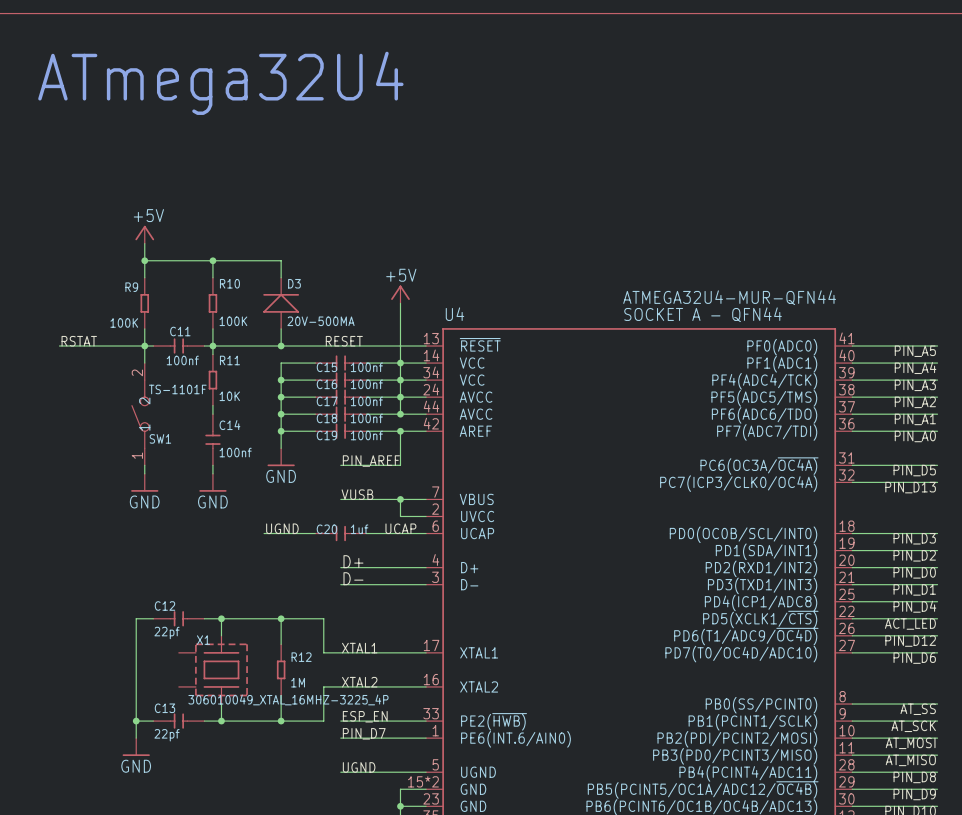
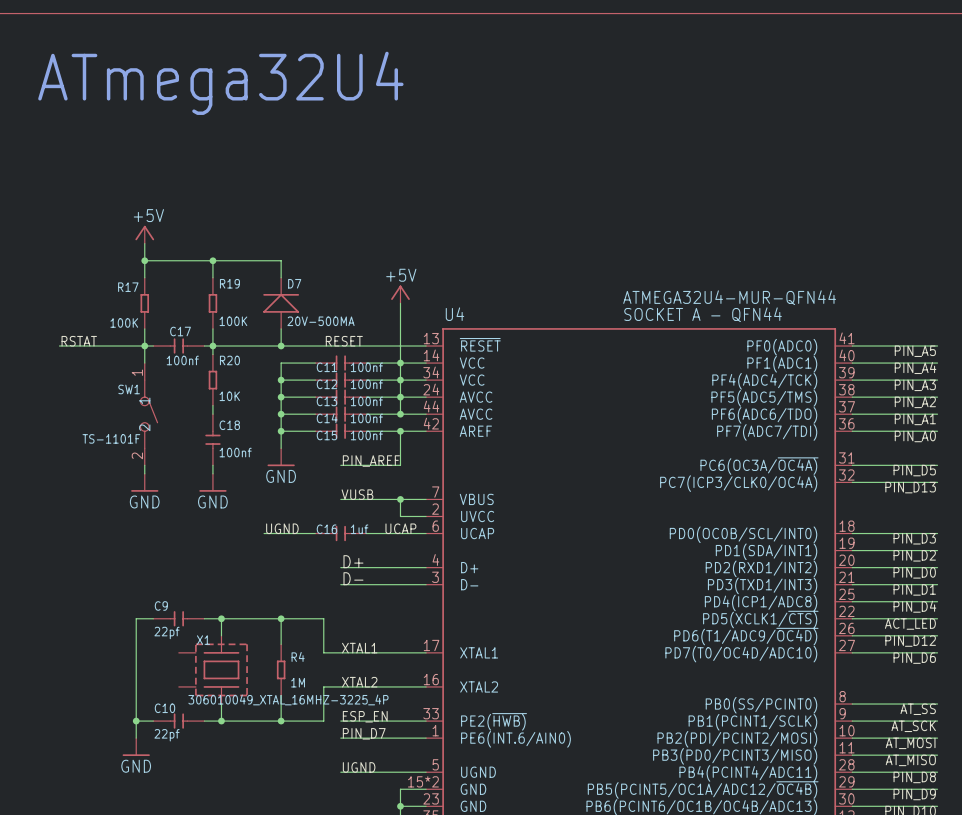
R10 name: R10 (229, 283) -> R19 (229, 283)
D3 name: D3 (294, 283) -> D7 (294, 283)
R9 name: R9 (131, 287) -> R17 (128, 287)
C11 name: C11 (180, 331) -> C17 (180, 331)
R11 name: R11 (229, 360) -> R20 (229, 360)
C15 name: C15 (326, 367) -> C11 (326, 367)
C16 name: C16 (326, 384) -> C12 (326, 384)
C17 name: C17 (327, 401) -> C13 (326, 401)
SW1 rotation: 0° (140, 414) -> 180° (149, 414)
C18 name: C18 (326, 418) -> C14 (327, 418)
C14 name: C14 (229, 425) -> C18 (229, 425)
C19 name: C19 (326, 435) -> C15 (326, 435)
C20 name: C20 (326, 529) -> C16 (326, 529)
C12 name: C12 (164, 605) -> C9 (161, 605)
R12 name: R12 (301, 657) -> R4 (298, 656)
C13 name: C13 (164, 708) -> C10 (164, 708)

